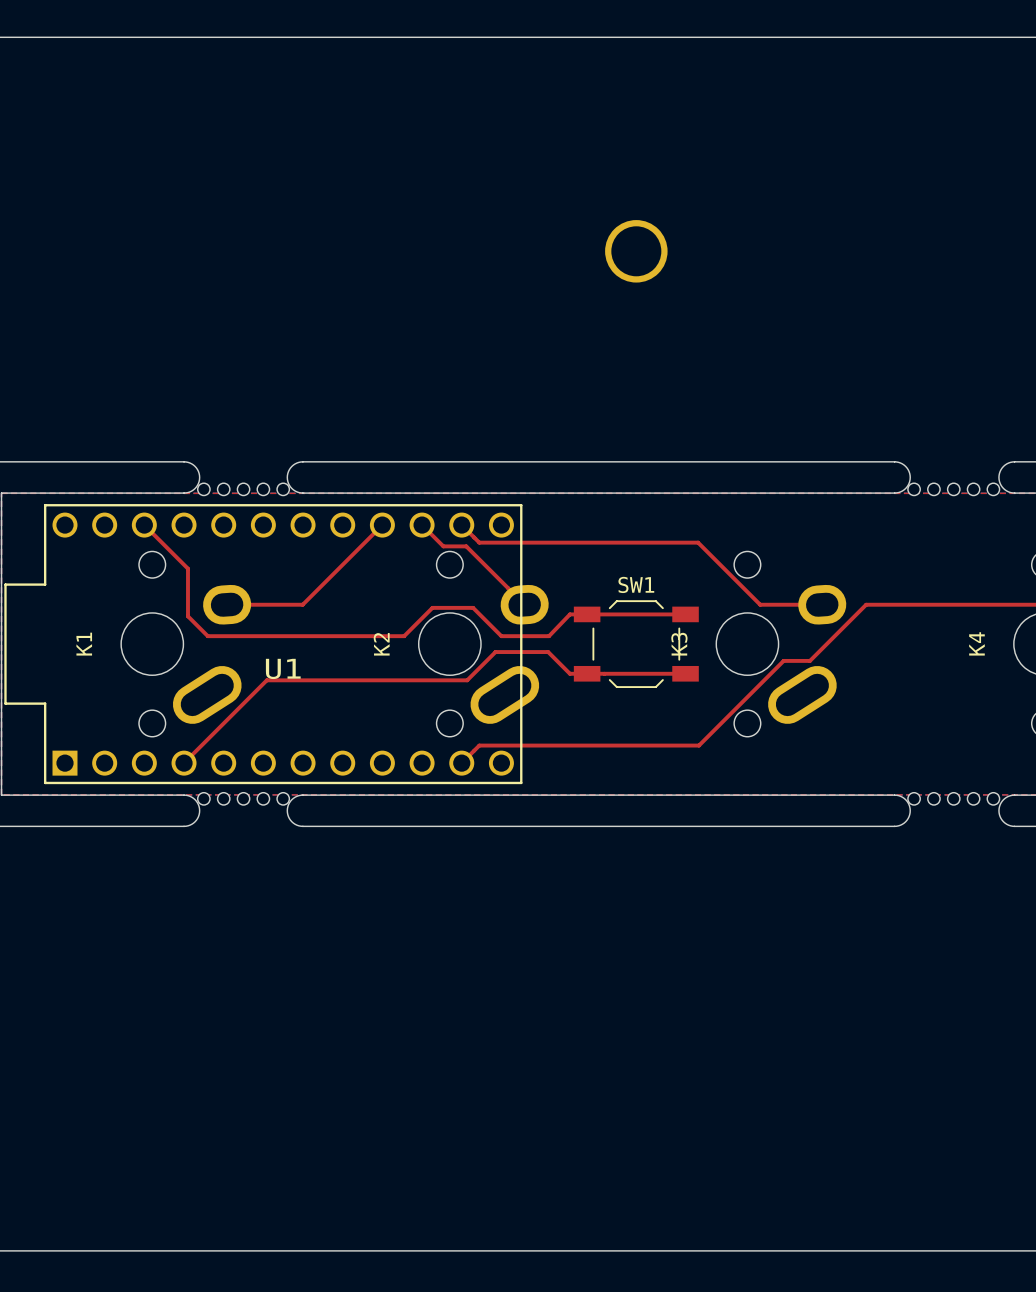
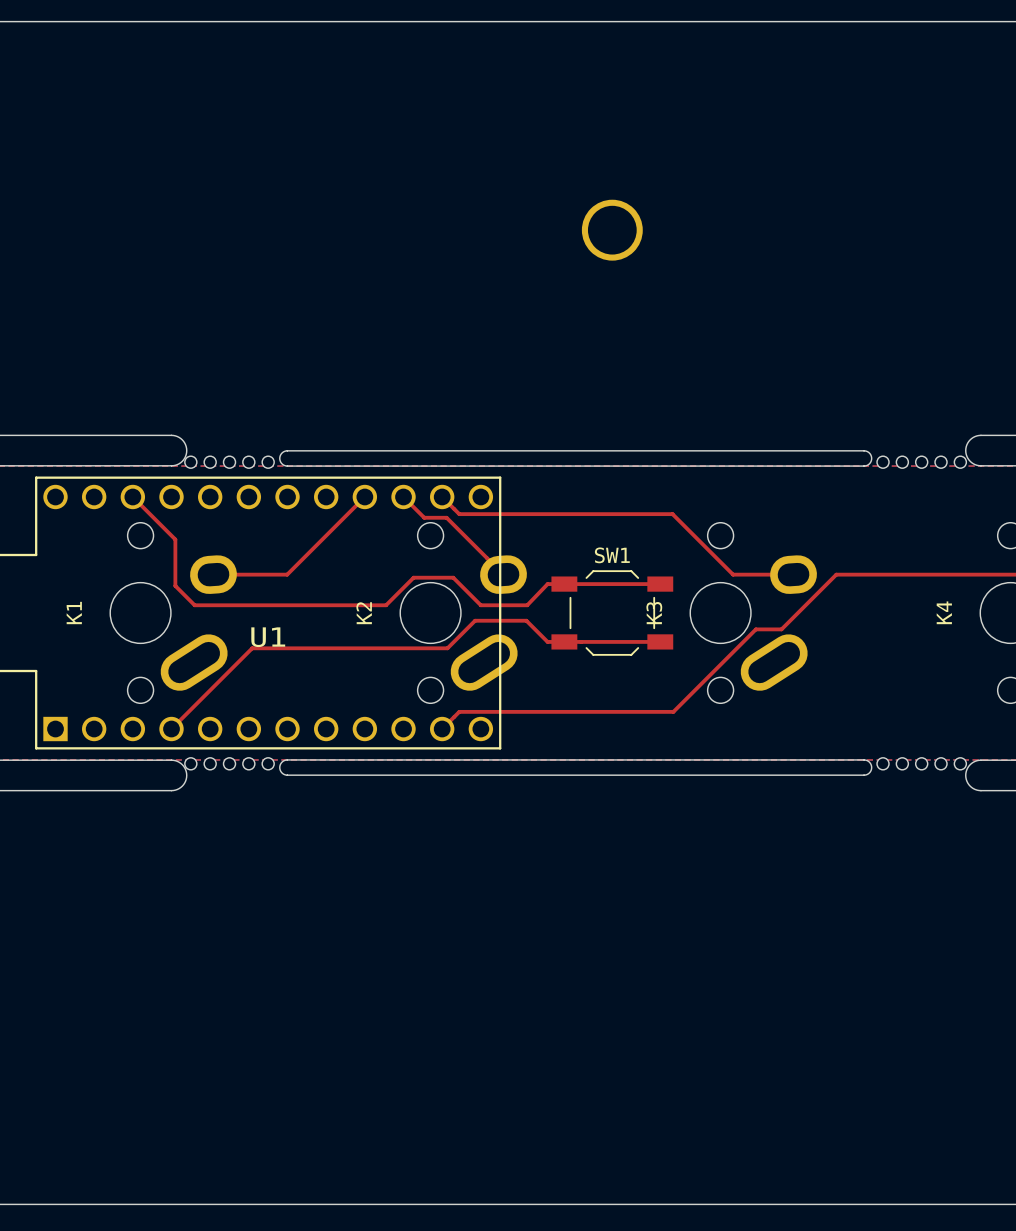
board edge: (302, 461) (894, 461) (905, 466) (910, 477) (905, 488) (894, 493) (302, 493) (291, 488) (287, 477) (291, 466) (302, 461) -> none
board edge: none -> (287, 450) (864, 450) (869, 453) (871, 458) (869, 463) (864, 466) (287, 466) (282, 463) (279, 458) (282, 453) (287, 450)
board edge: (302, 795) (894, 795) (905, 799) (910, 810) (905, 821) (894, 826) (302, 826) (291, 821) (287, 810) (291, 799) (302, 795) -> (287, 759) (282, 762) (279, 767) (282, 772) (287, 775) (864, 775) (869, 772) (871, 767) (869, 762) (864, 759) (287, 759)

